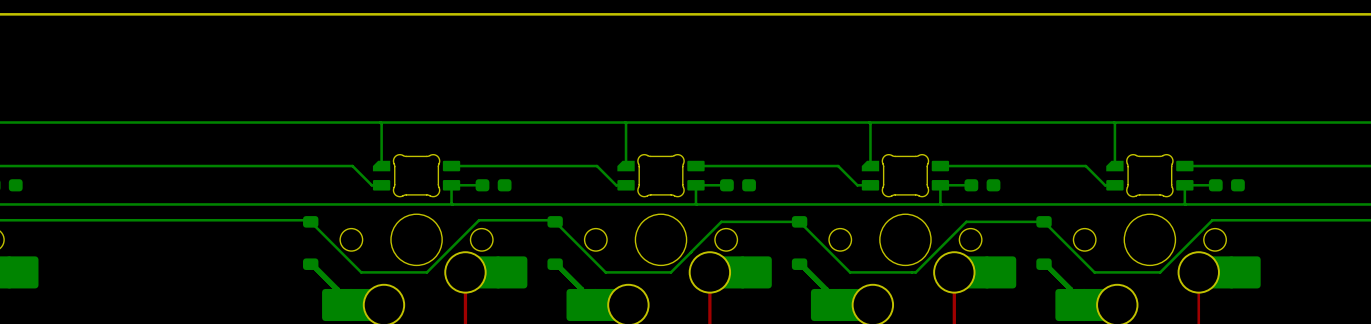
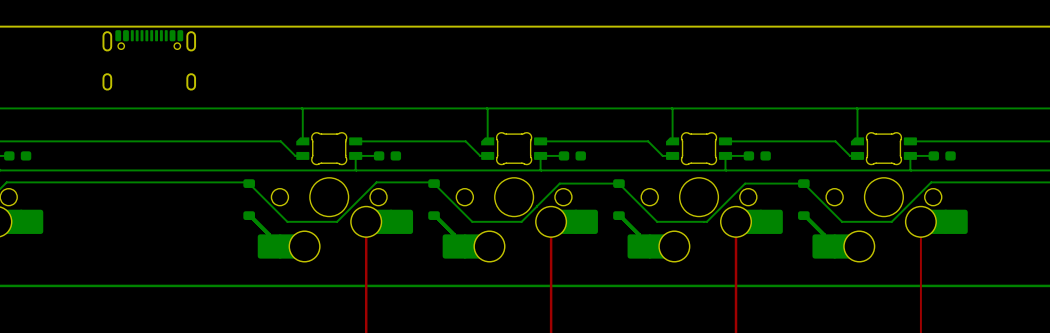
part: none -> (149, 60)

